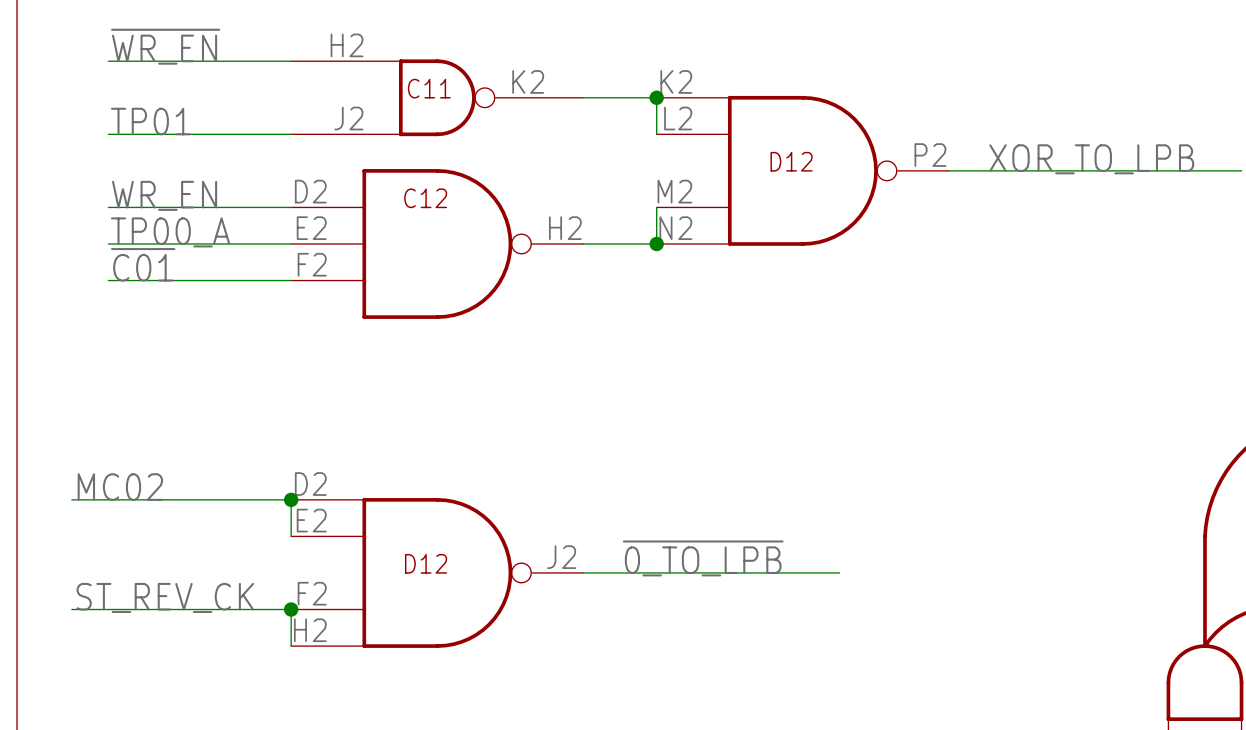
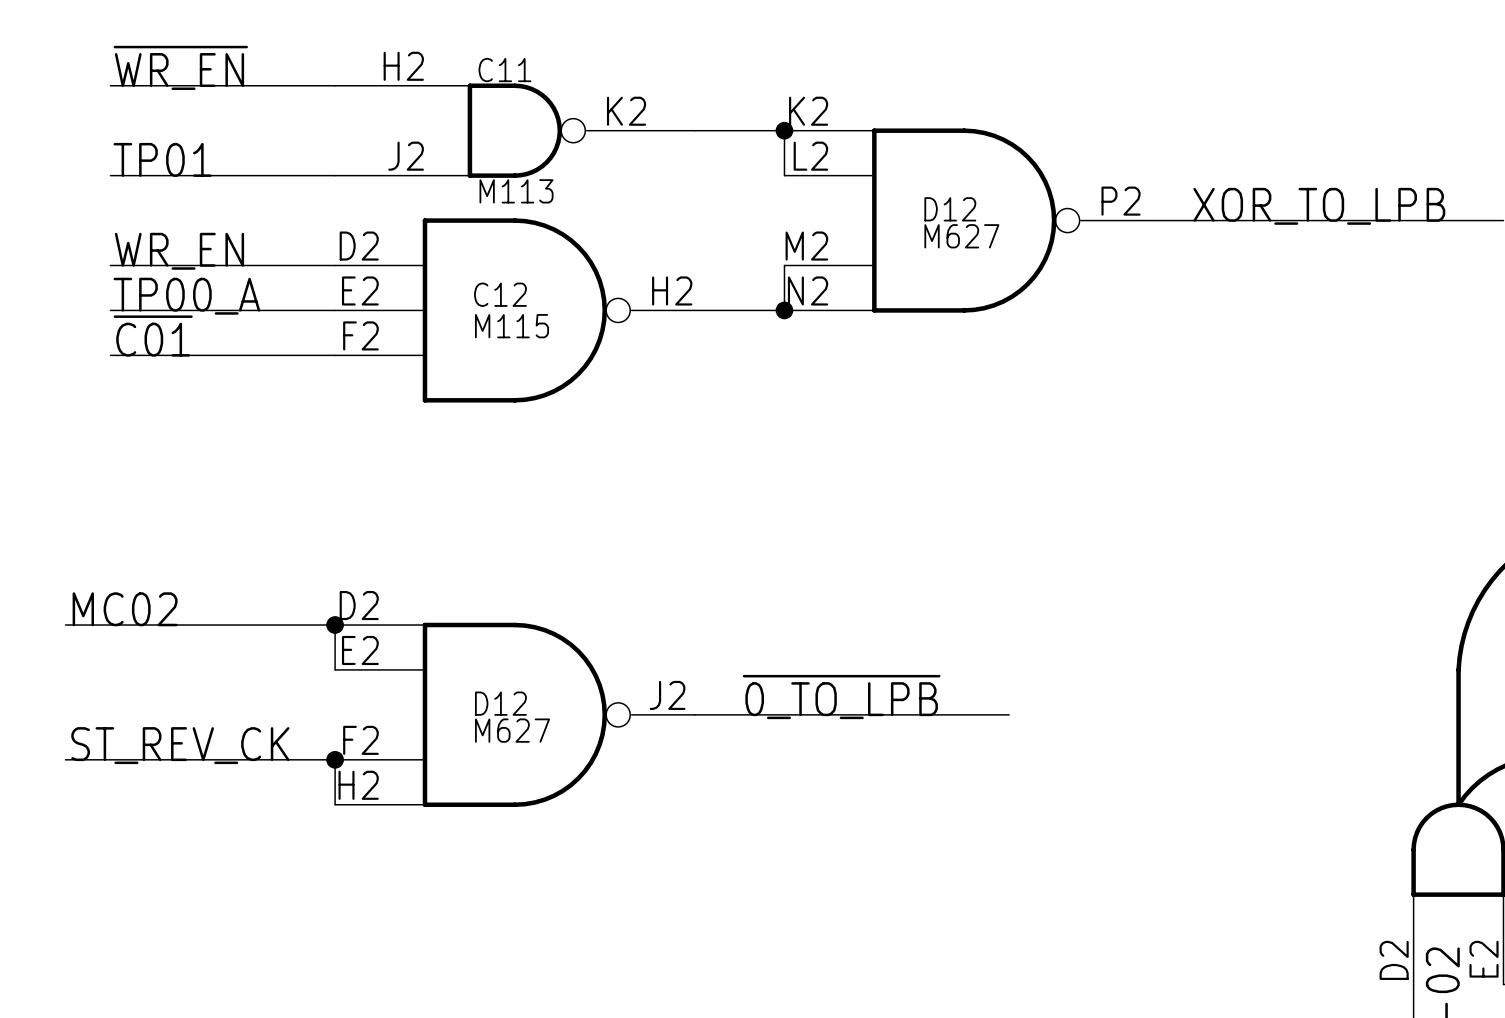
C11 name position: C11 (429, 88) -> C11 (504, 70)
C11 value: none -> M113 (516, 191)
D12 value: none -> M627 (961, 236)
C12 name position: C12 (425, 198) -> C12 (500, 294)
C12 value: none -> M115 (512, 326)
D12 value: none -> M627 (512, 730)

